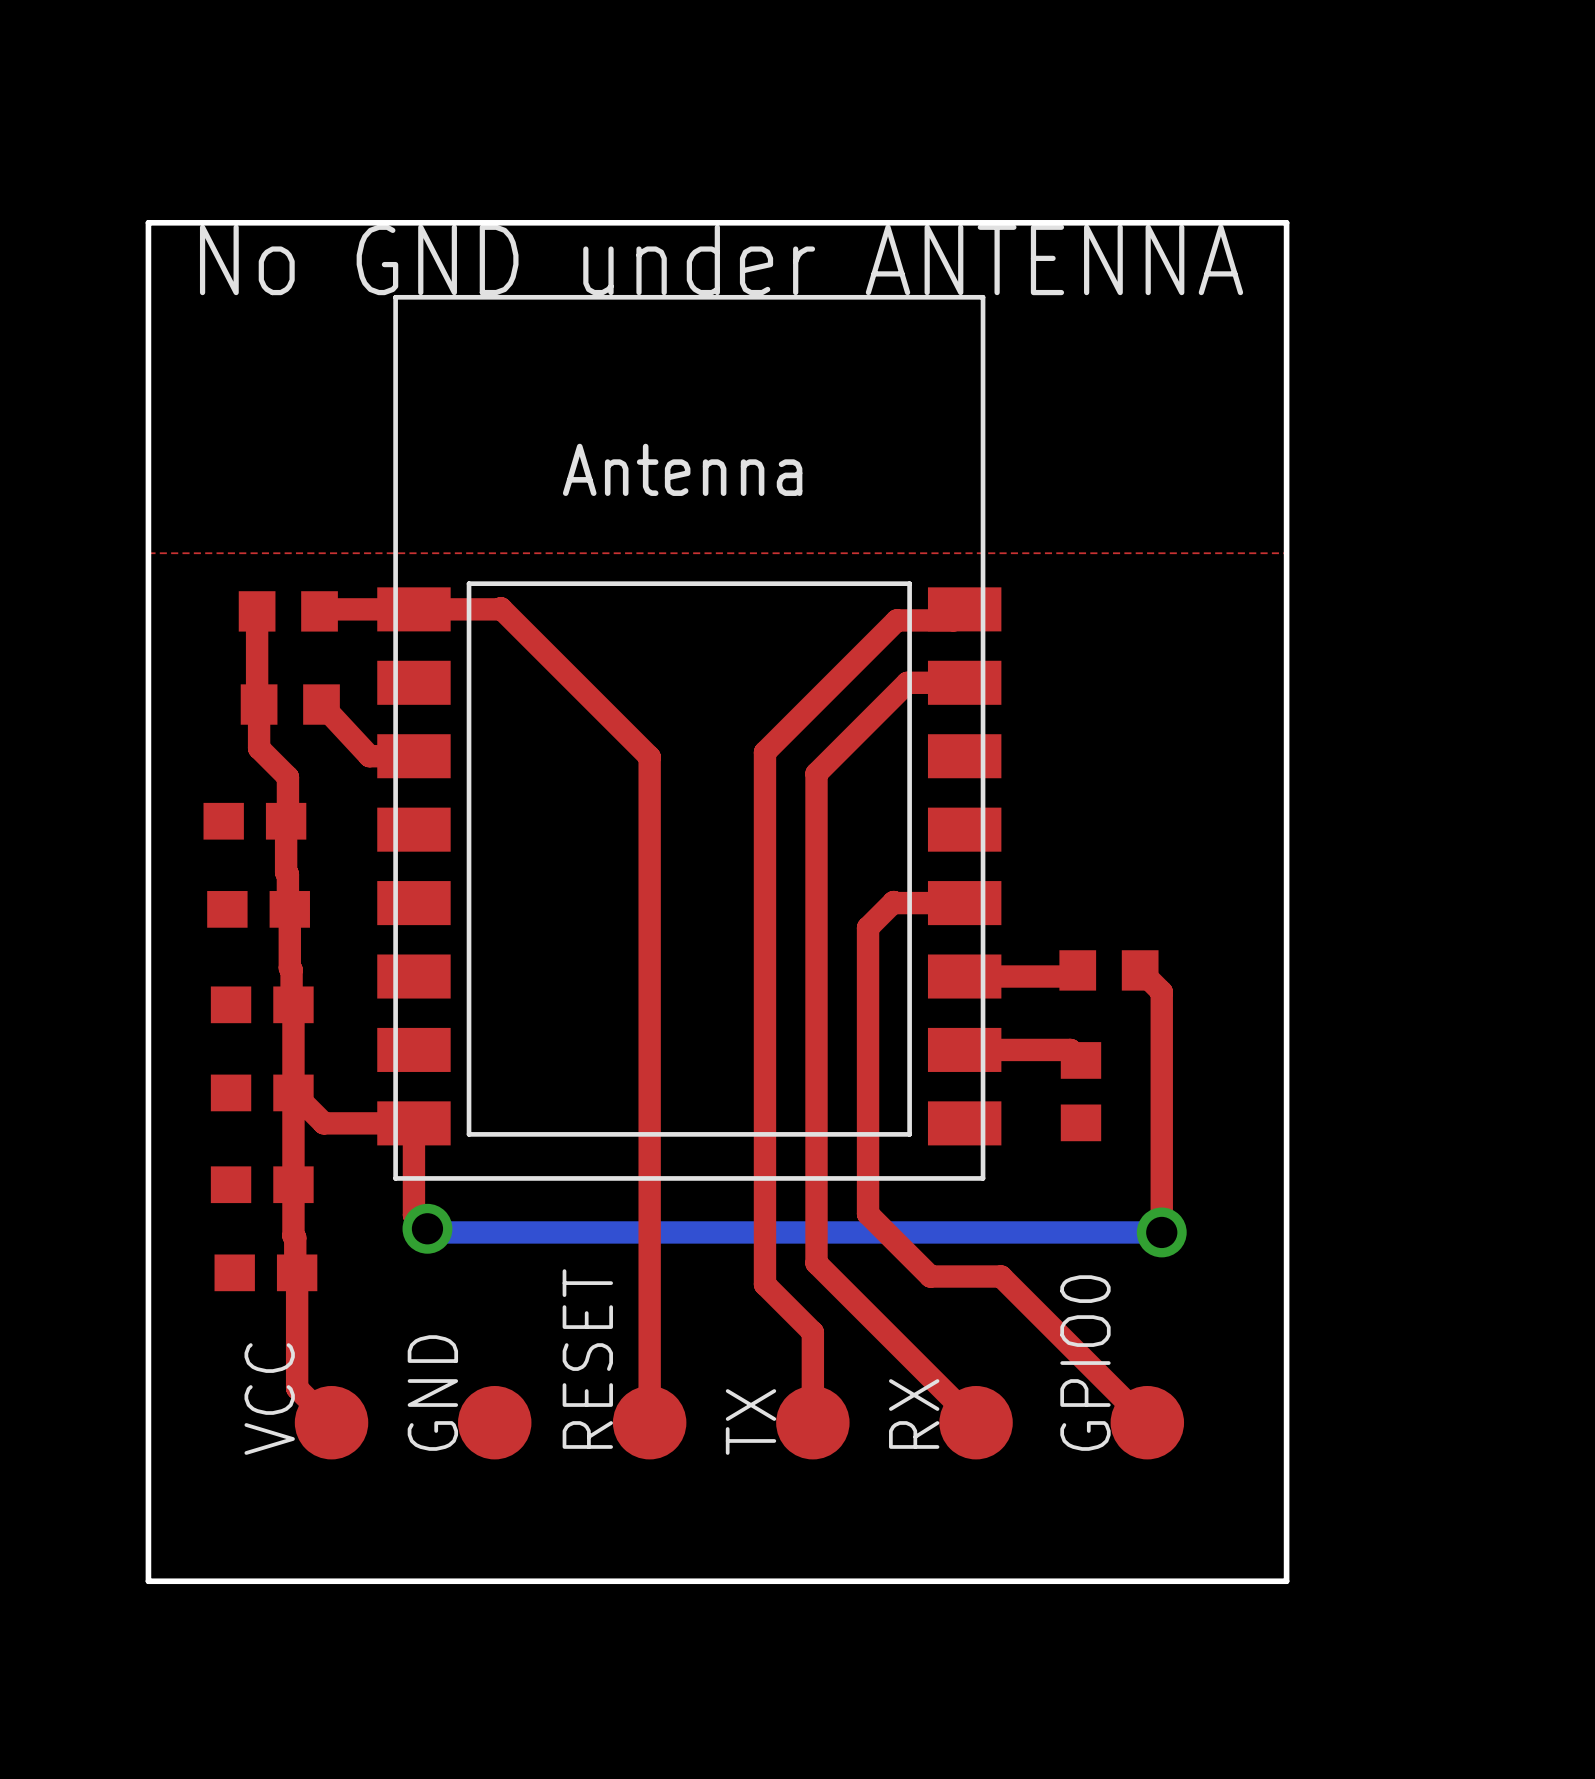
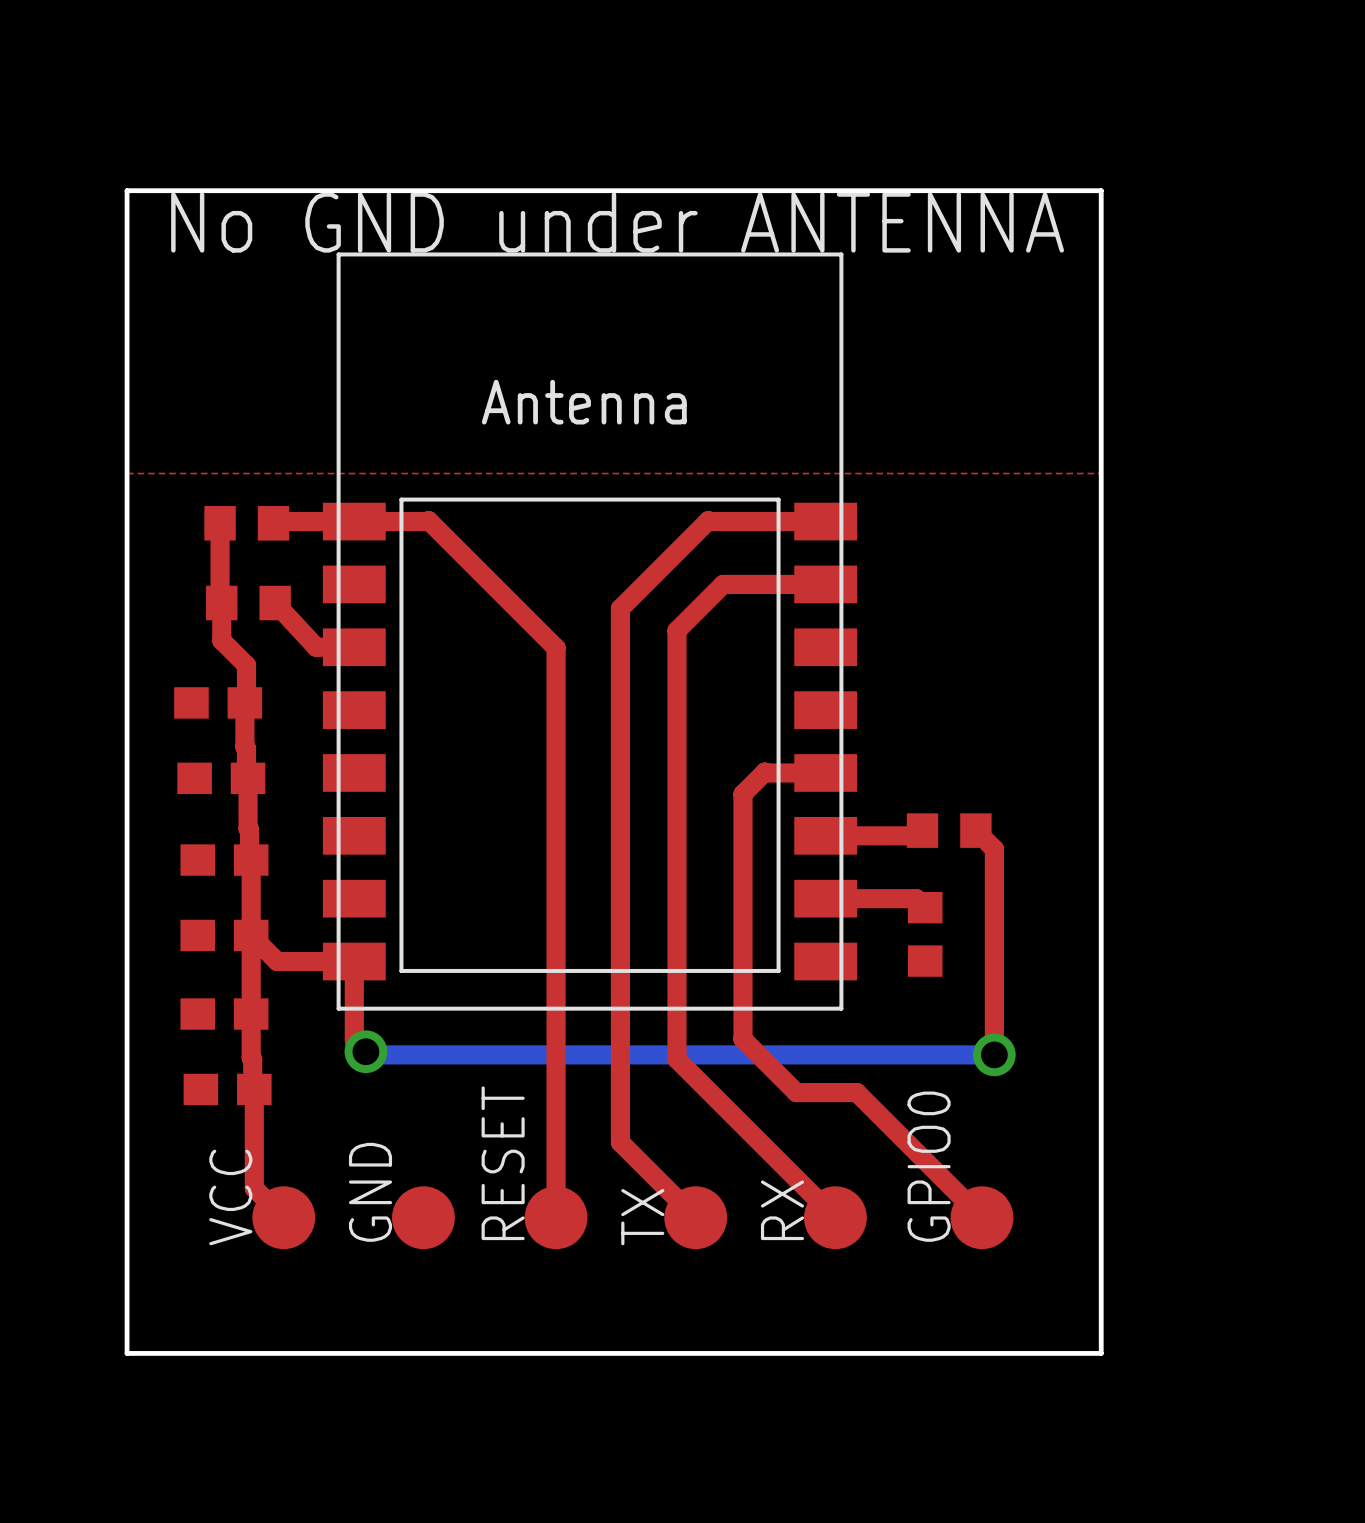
top track: (964, 609) (953, 620) (896, 620) (764, 752) (764, 1284) (812, 1332) (812, 1422) -> (825, 521) (708, 520) (620, 608) (620, 1142) (695, 1217)
top track: (907, 682) (816, 773) (816, 1263) -> (776, 584) (723, 584) (676, 630) (676, 1059) (698, 1081)

